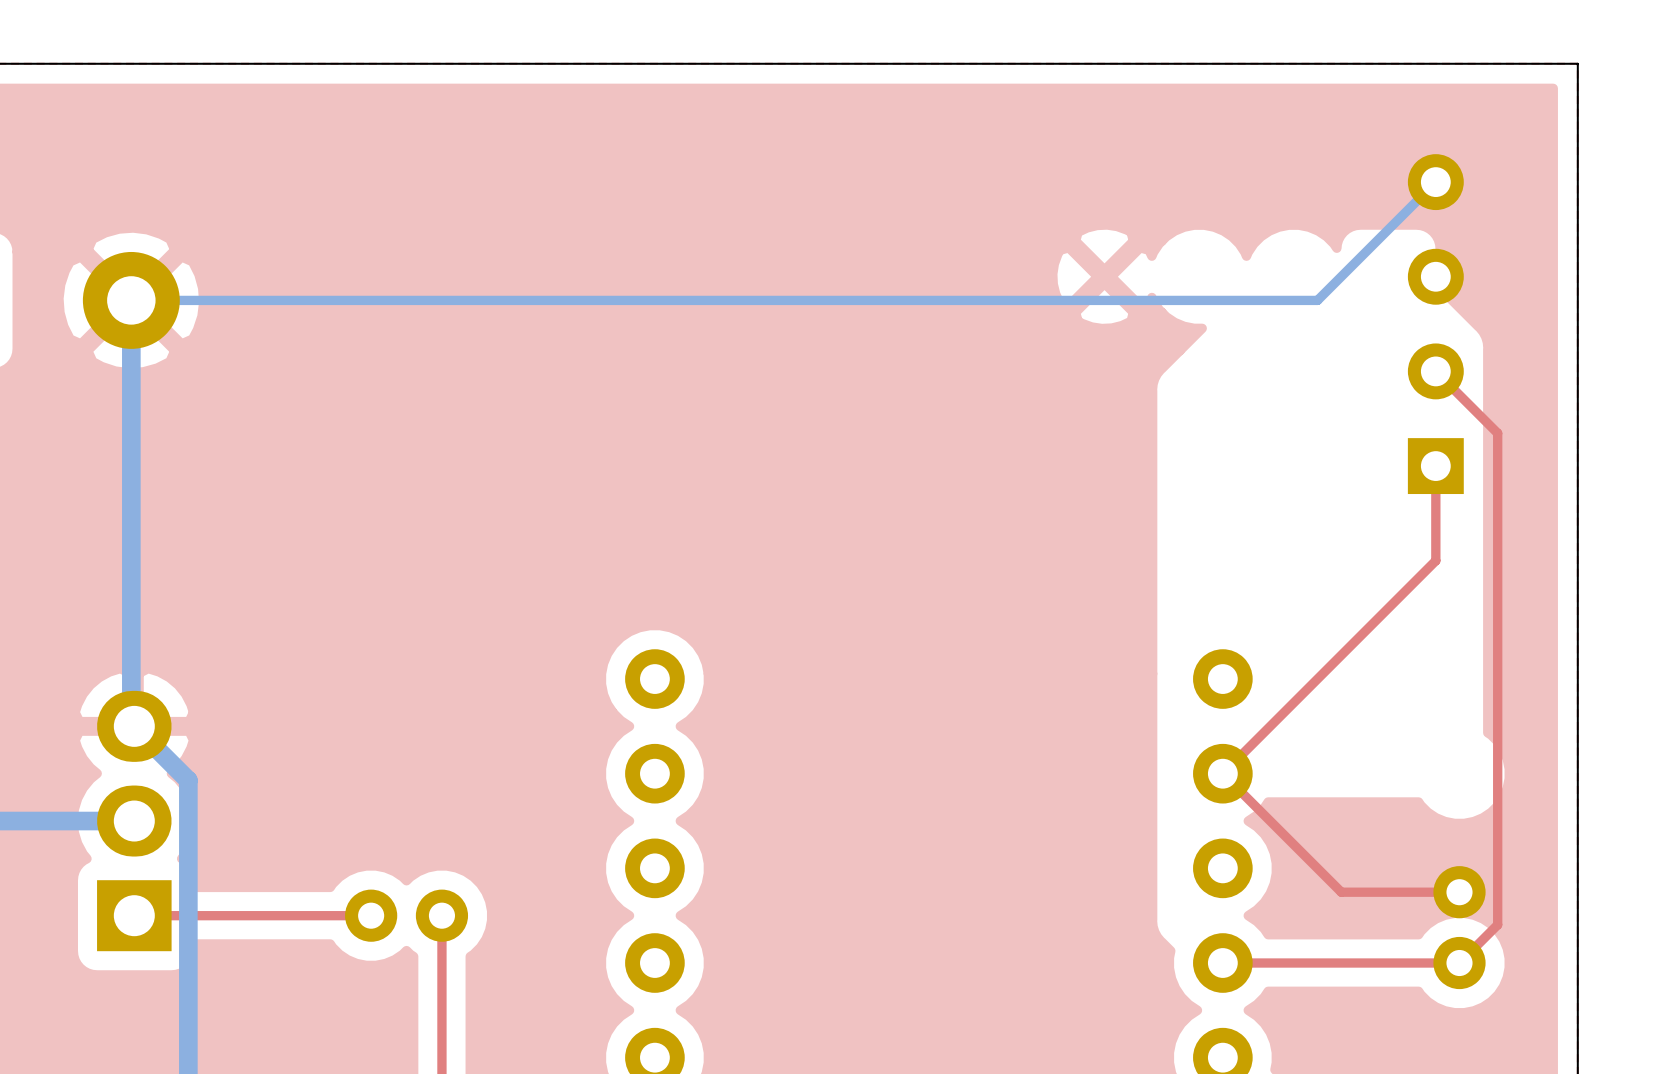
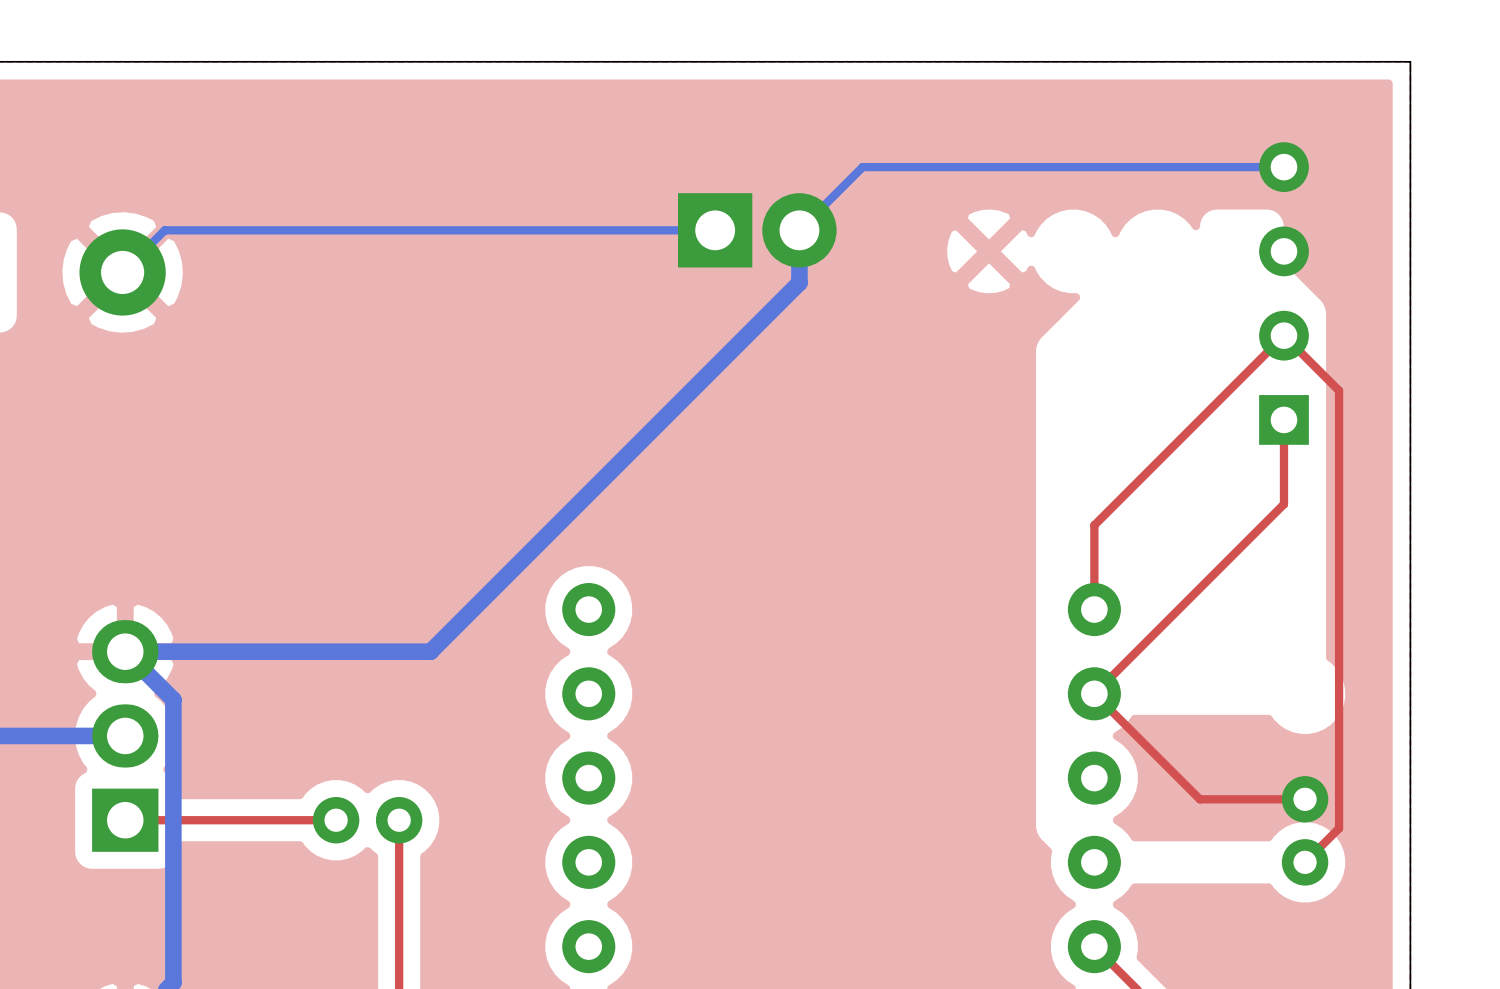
bottom track: (1435, 182) (1317, 300) (131, 300) (131, 723) (134, 726) -> (1283, 167) (862, 167) (799, 230) (799, 282) (430, 651) (125, 651)
bottom track: none -> (715, 230) (164, 230) (136, 258)
part: none -> (757, 230)
top track: none -> (1283, 335) (1094, 525) (1094, 609)
top track: (1459, 963) (1222, 963) -> none

